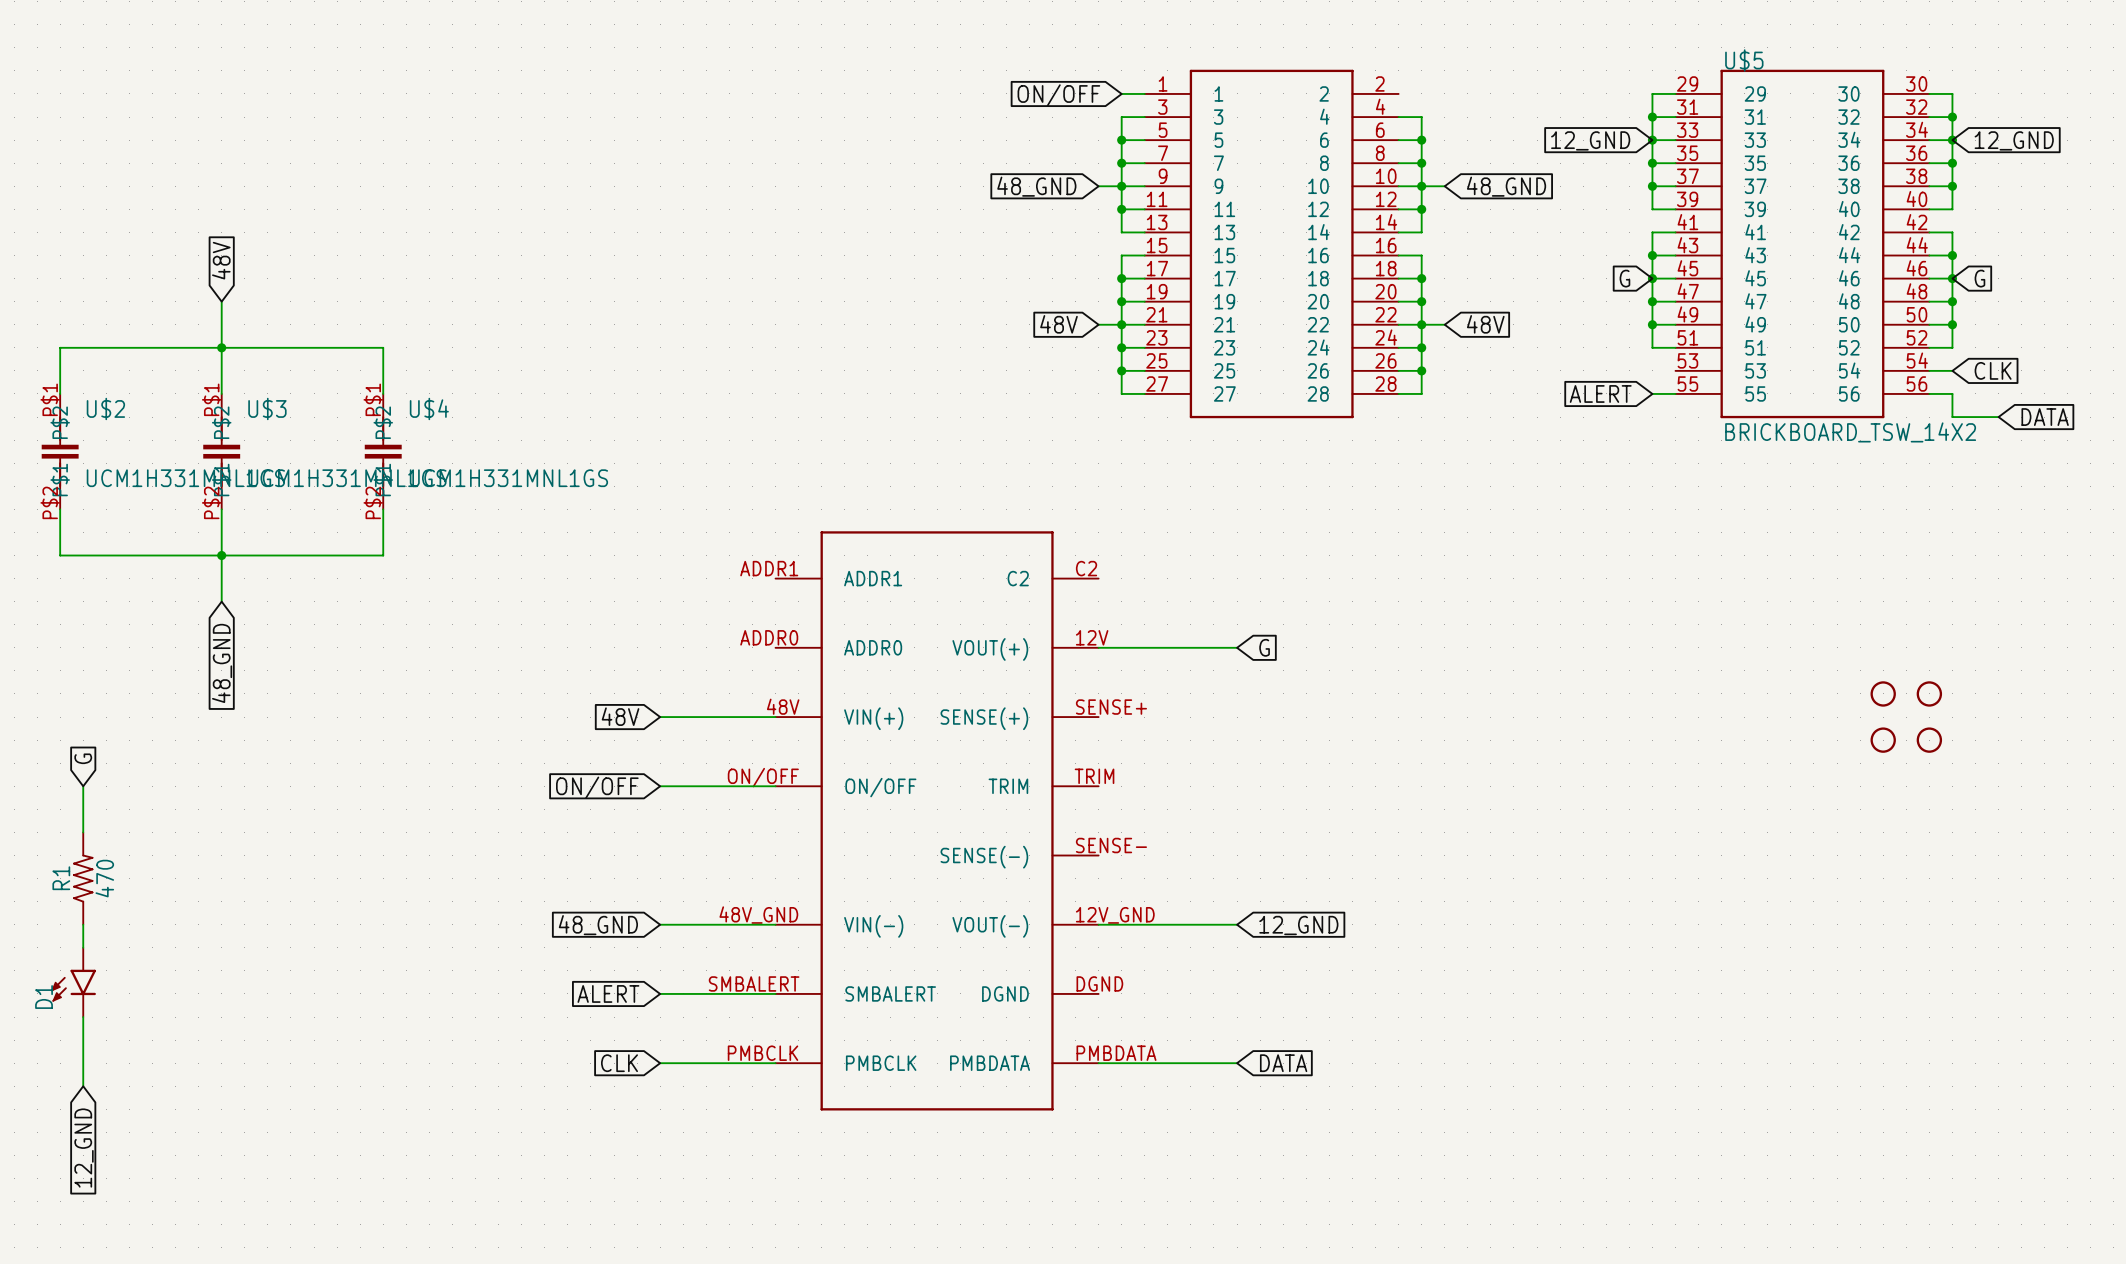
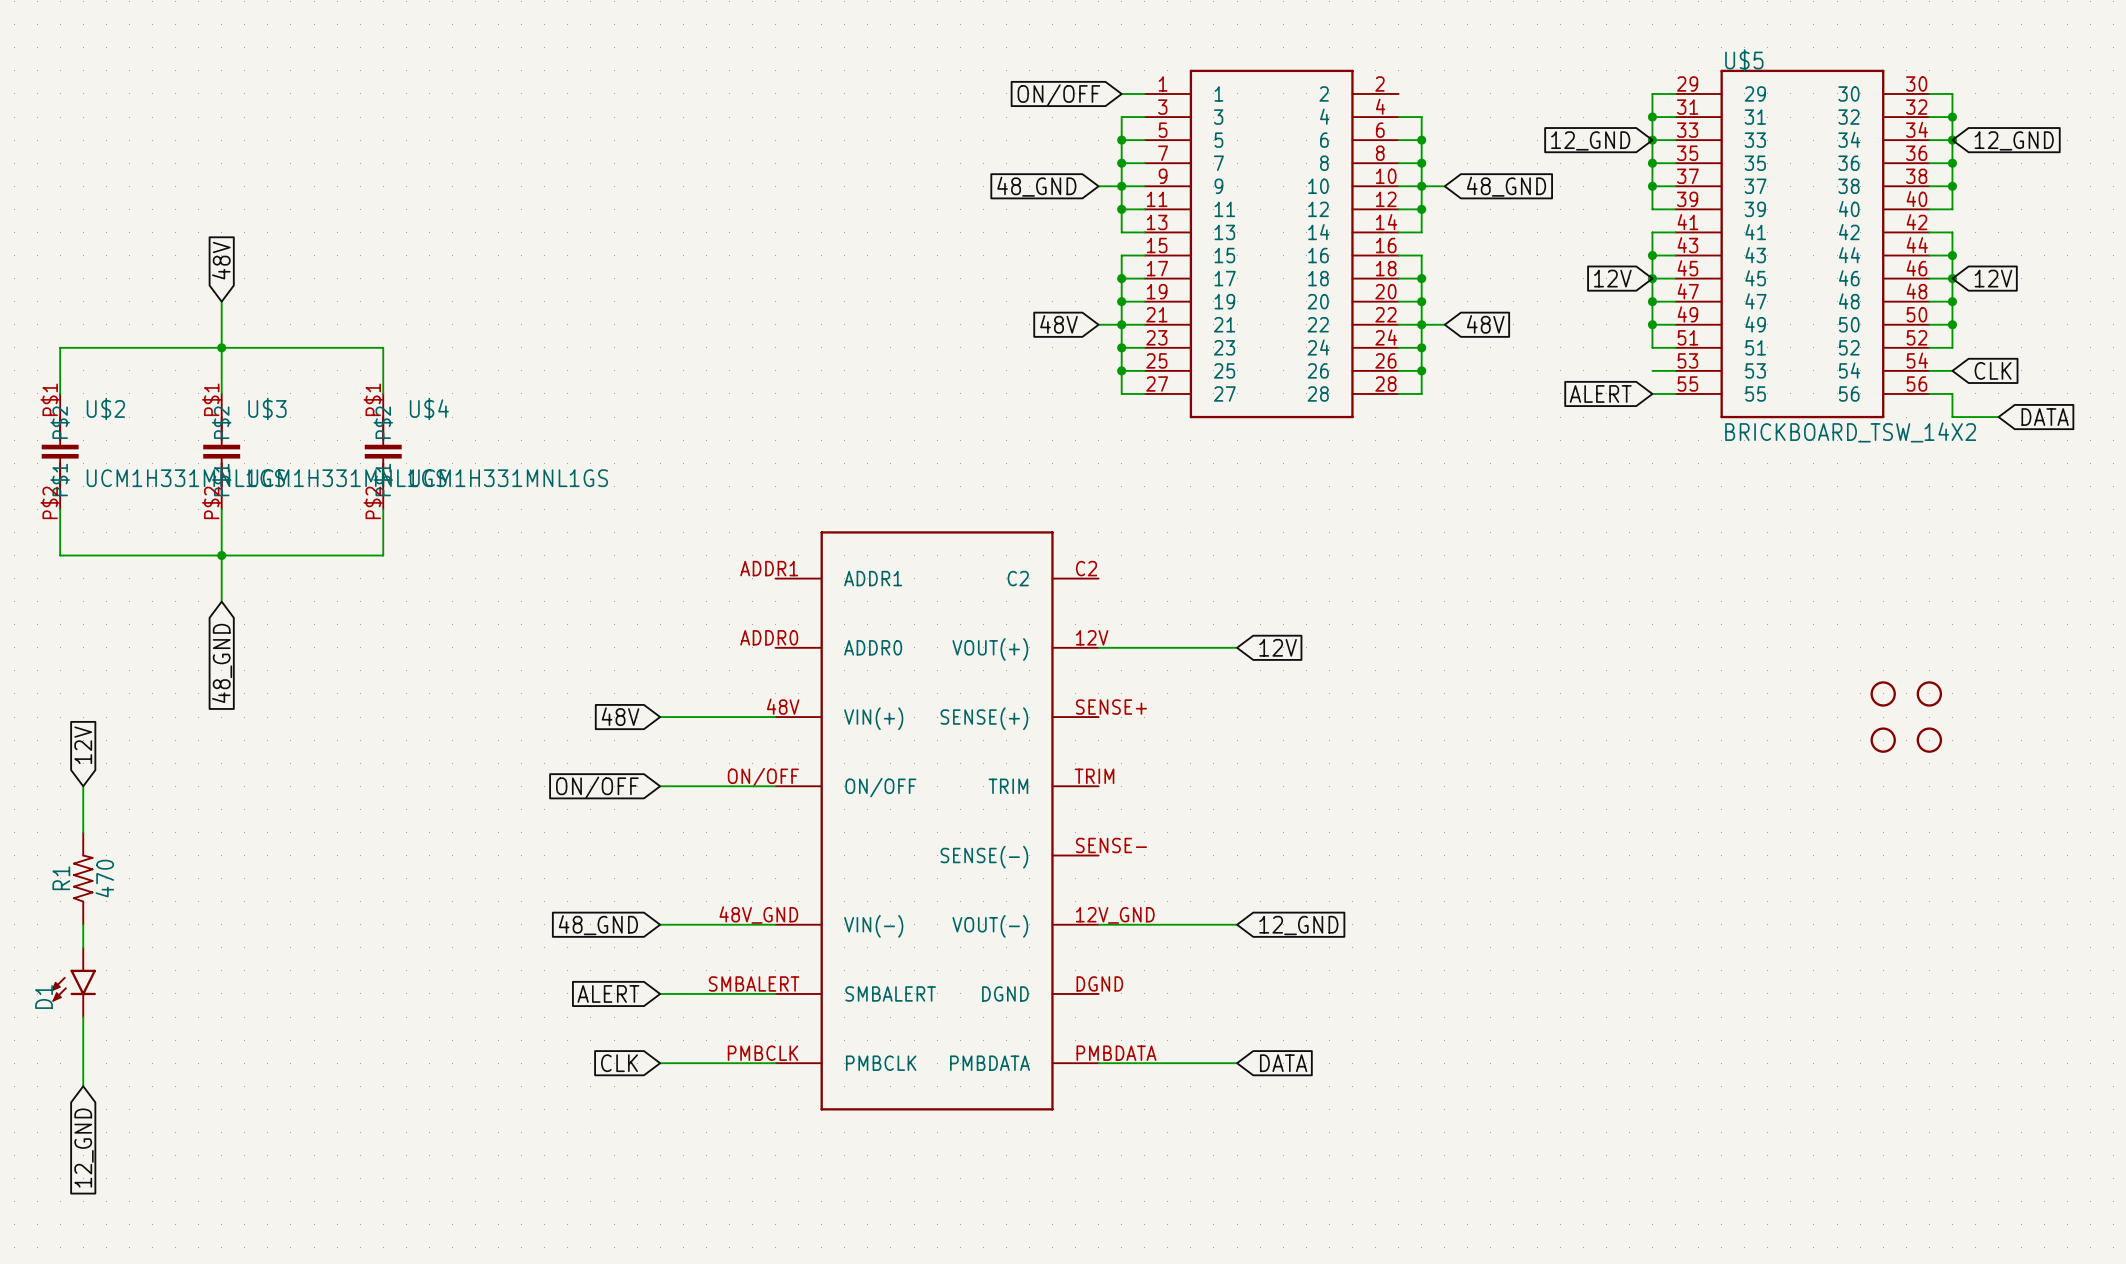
global label: G (1624, 278) -> 12V (1612, 278)
global label: G (1979, 278) -> 12V (1993, 278)
wire: none -> (1652, 370) (1675, 370)
global label: G (1264, 647) -> 12V (1278, 647)
global label: G (83, 758) -> 12V (83, 745)

